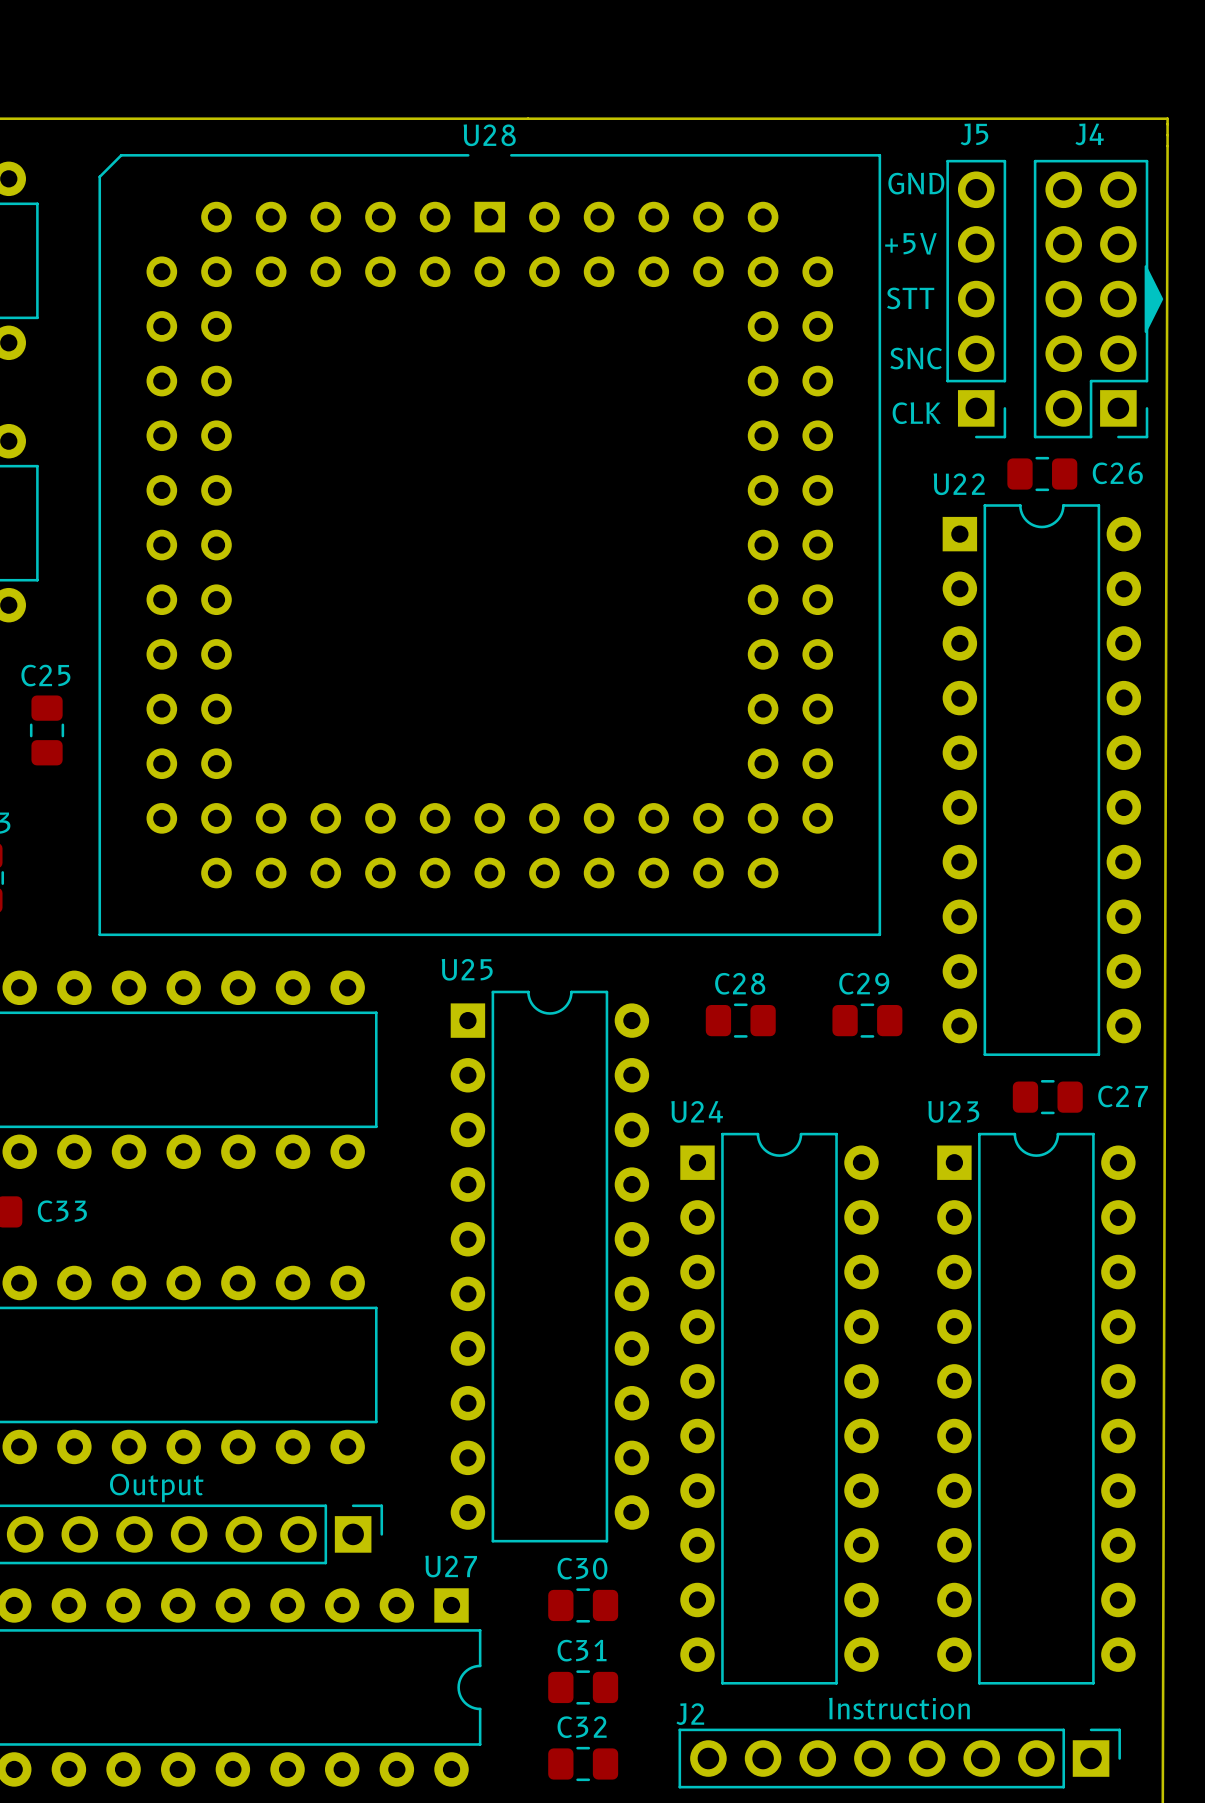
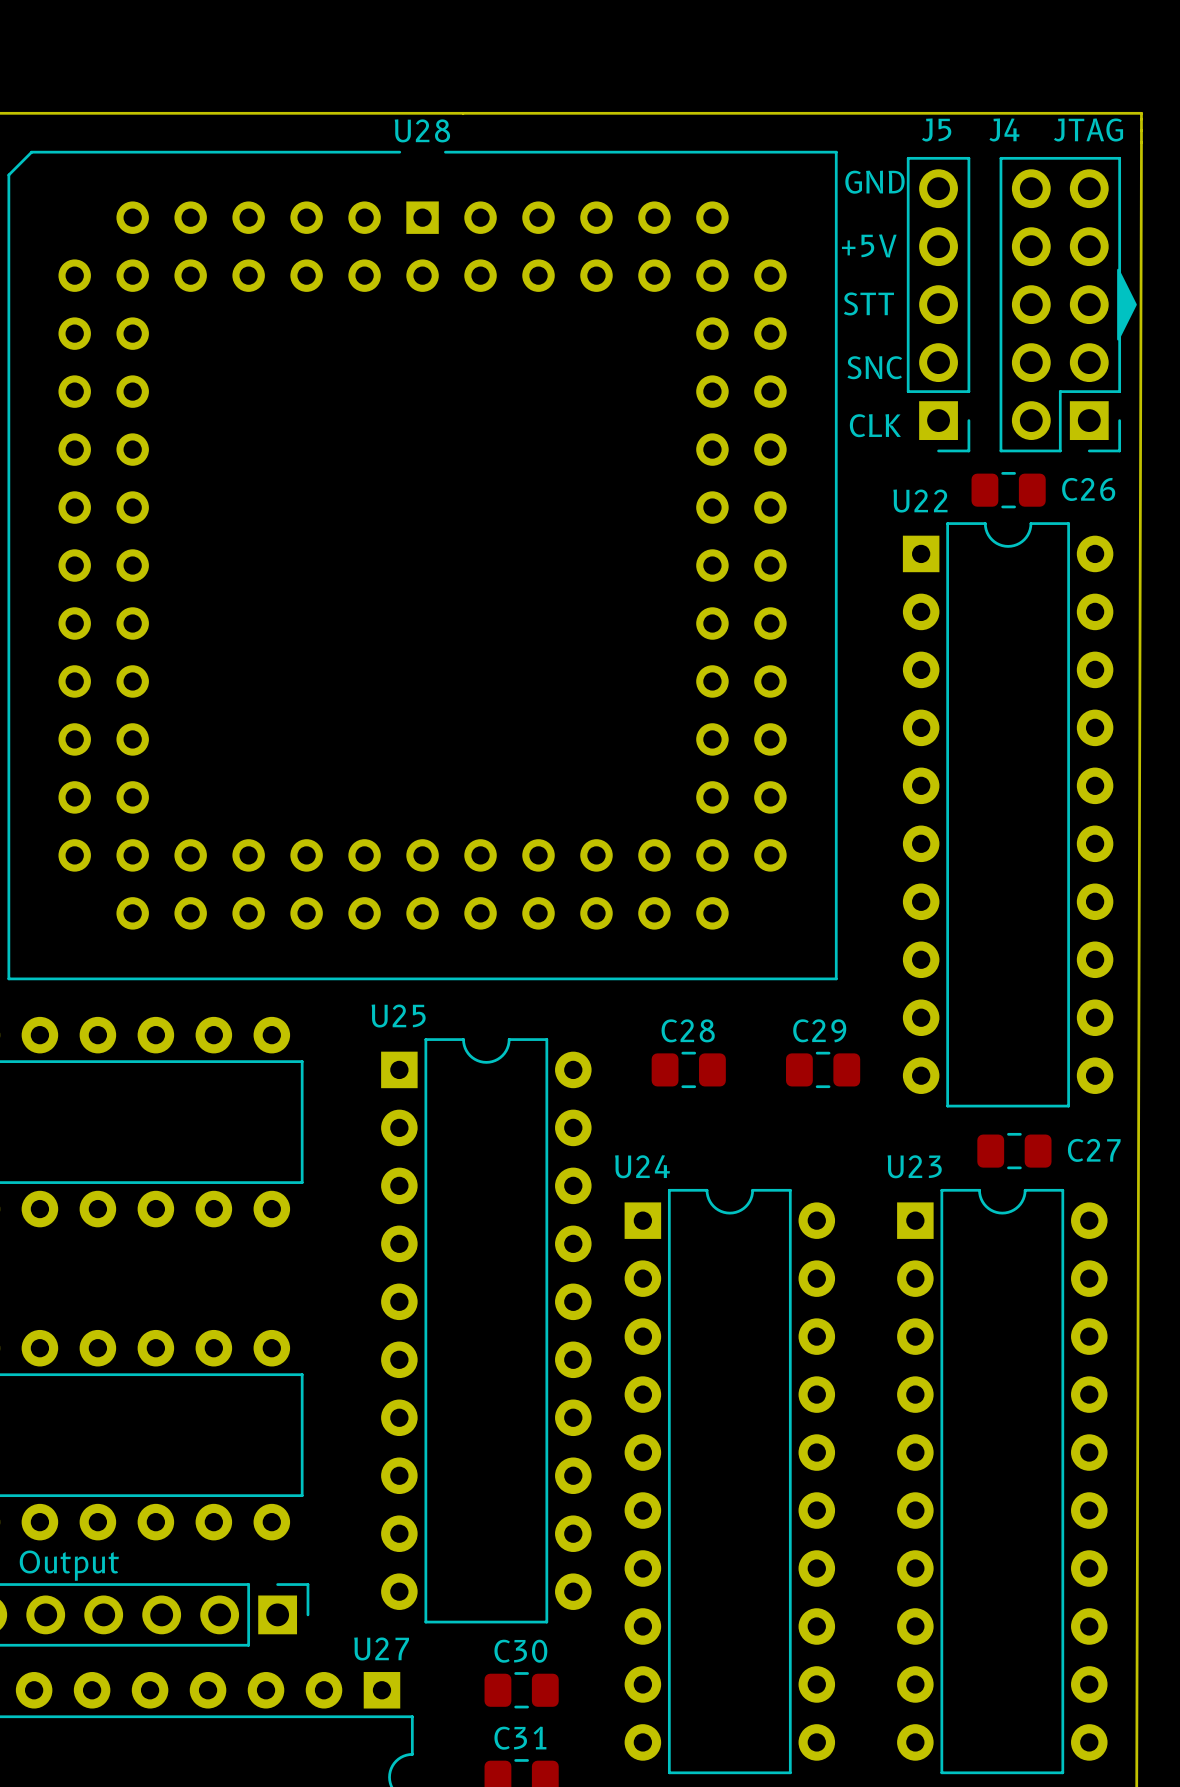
J4 name position: J4 (1089, 134) -> J4 (1004, 129)
text: none -> JTAG (1088, 129)

